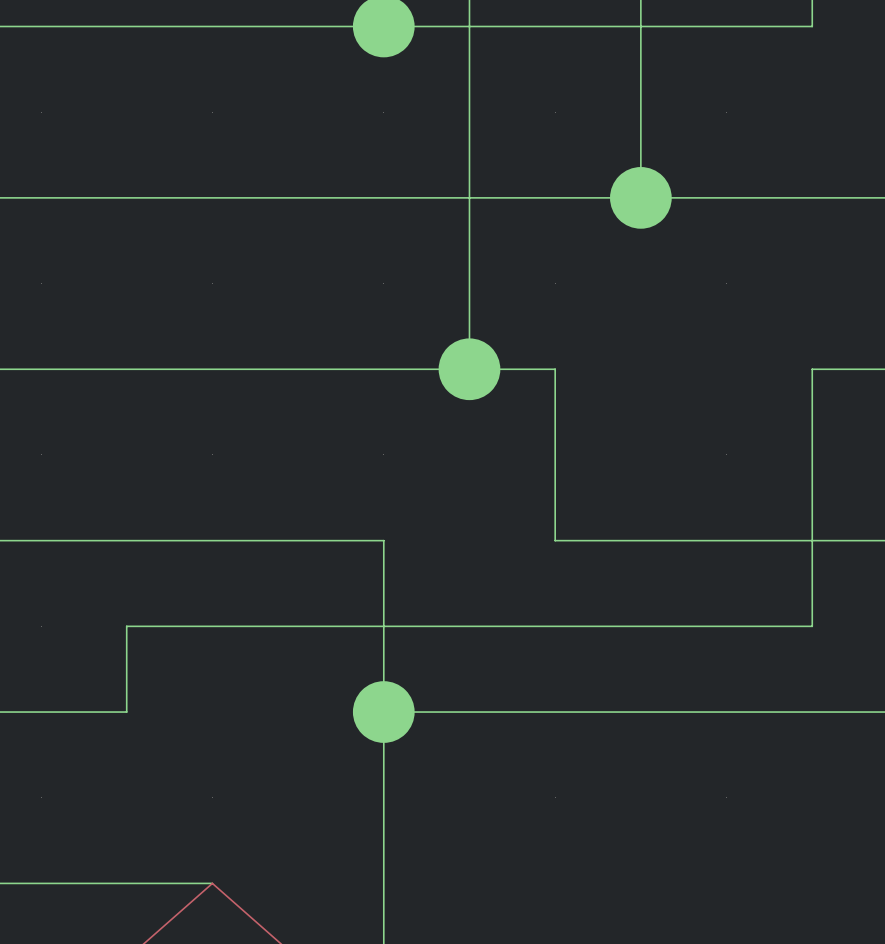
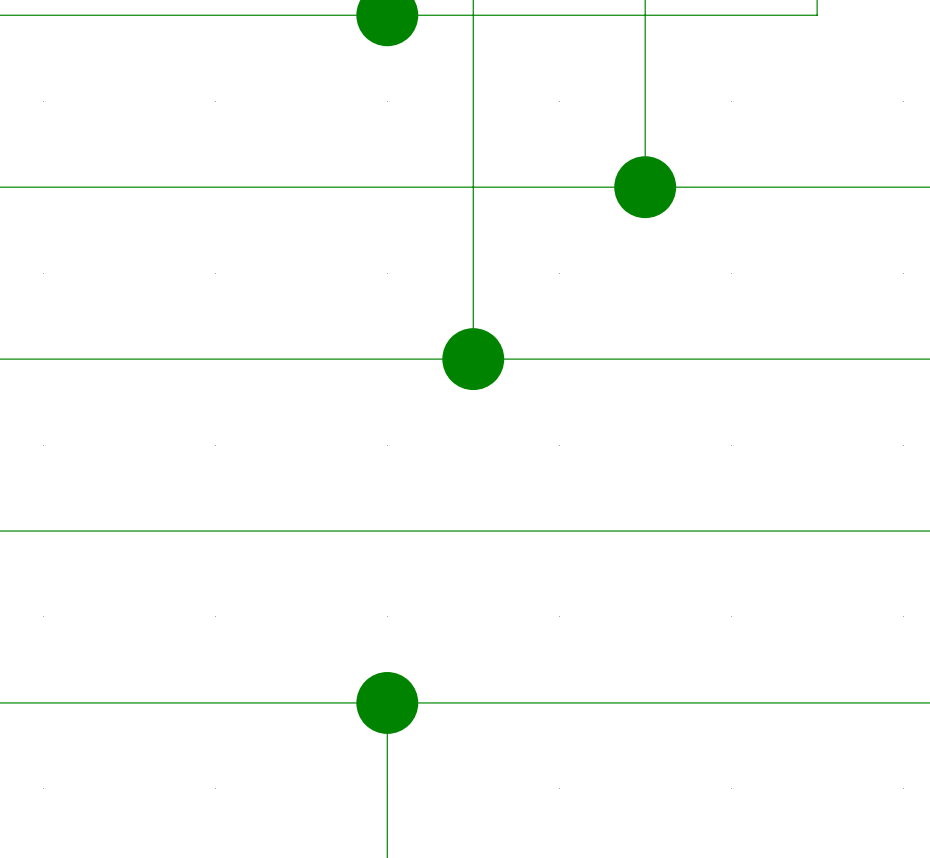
wire: (555, 369) (555, 540) -> (559, 359) (817, 359)
wire: (812, 369) (812, 626) (126, 626) (126, 712) -> (387, 702) (129, 702)
wire: (383, 540) (383, 712) -> (387, 531) (559, 531)

